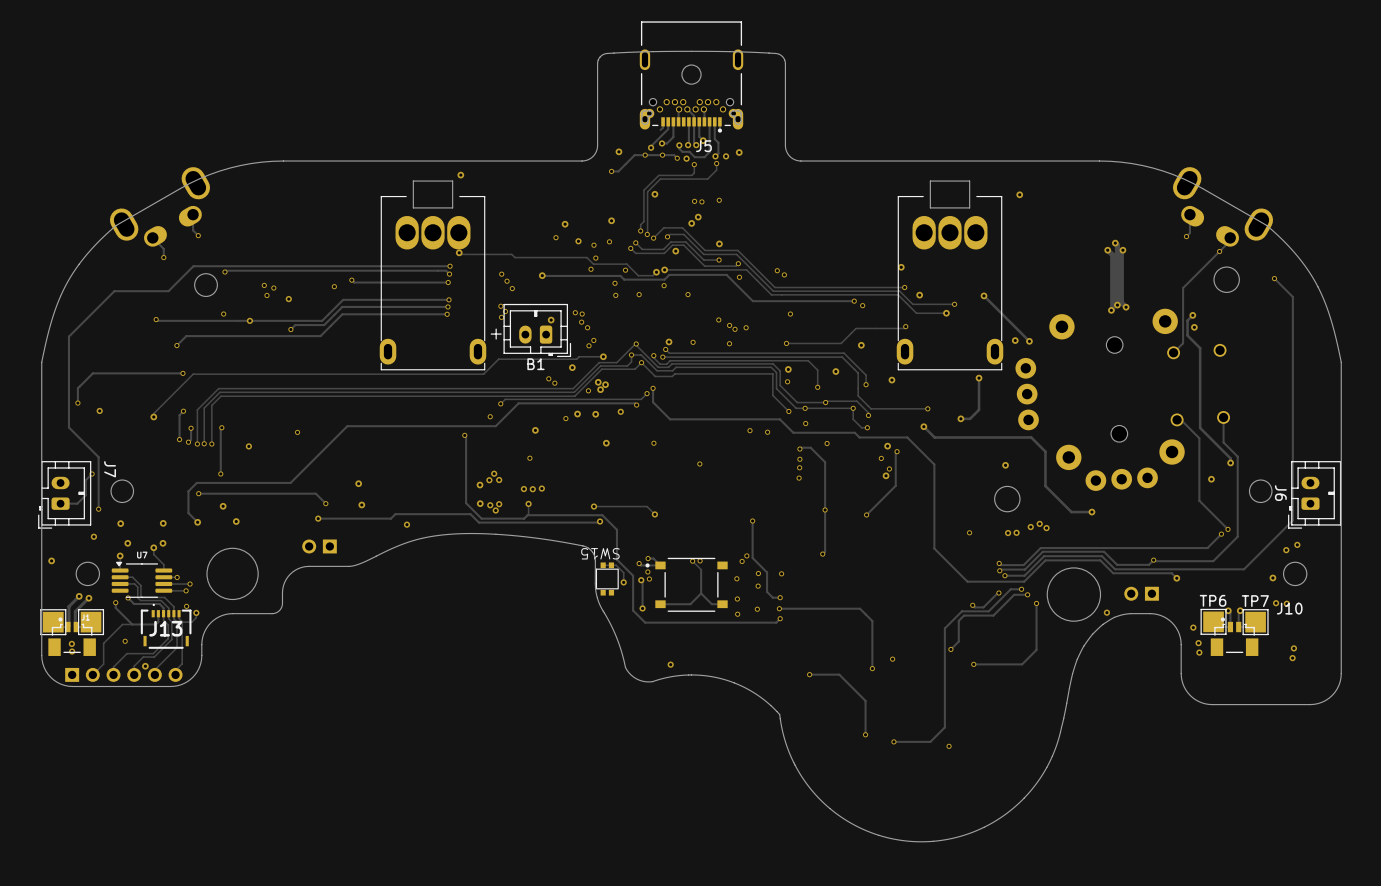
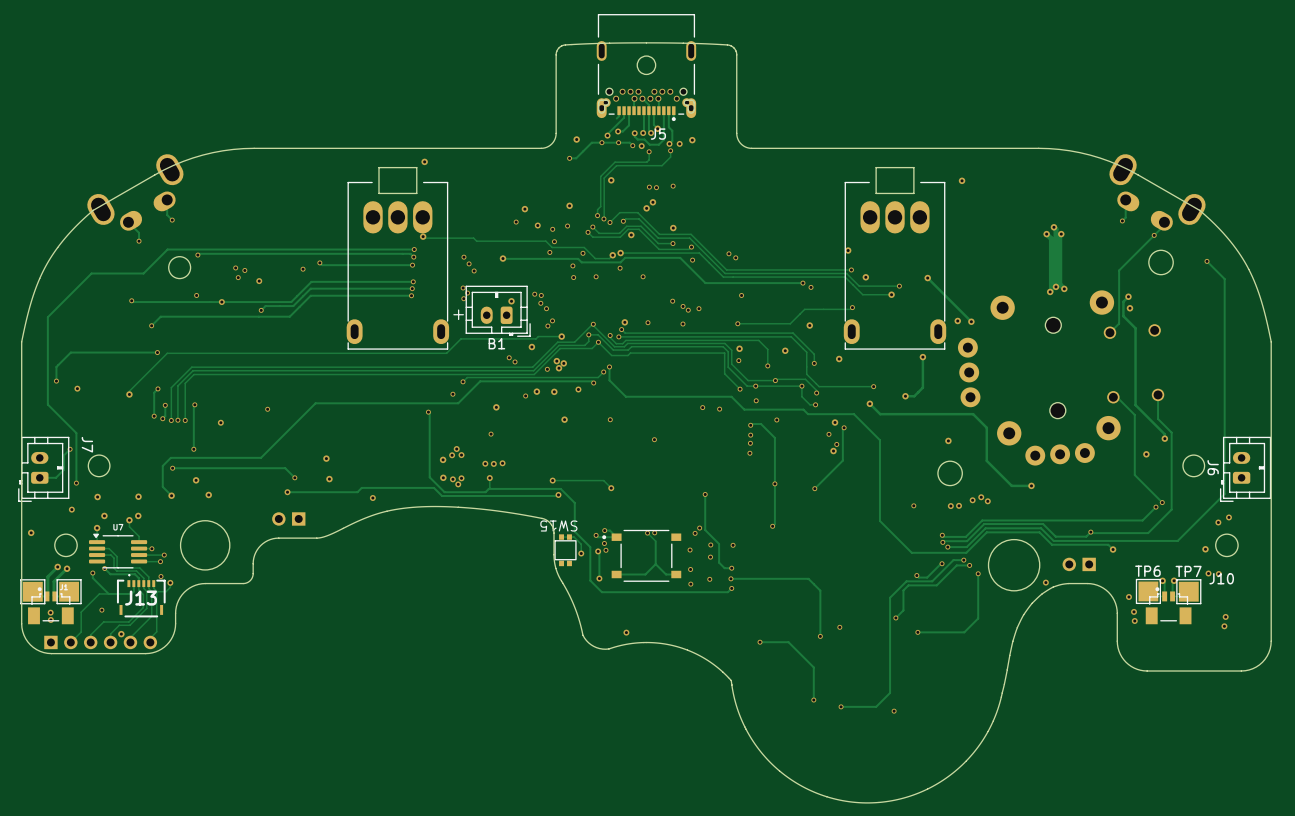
part footprint: [379, 196, 487, 371] -> [346, 182, 450, 350]
part footprint: [896, 196, 1004, 371] -> [843, 182, 947, 350]
part: none -> (373, 217)
part: none -> (397, 217)
part: none -> (422, 217)
part: none -> (870, 217)
part: none -> (895, 217)
part: none -> (919, 217)

